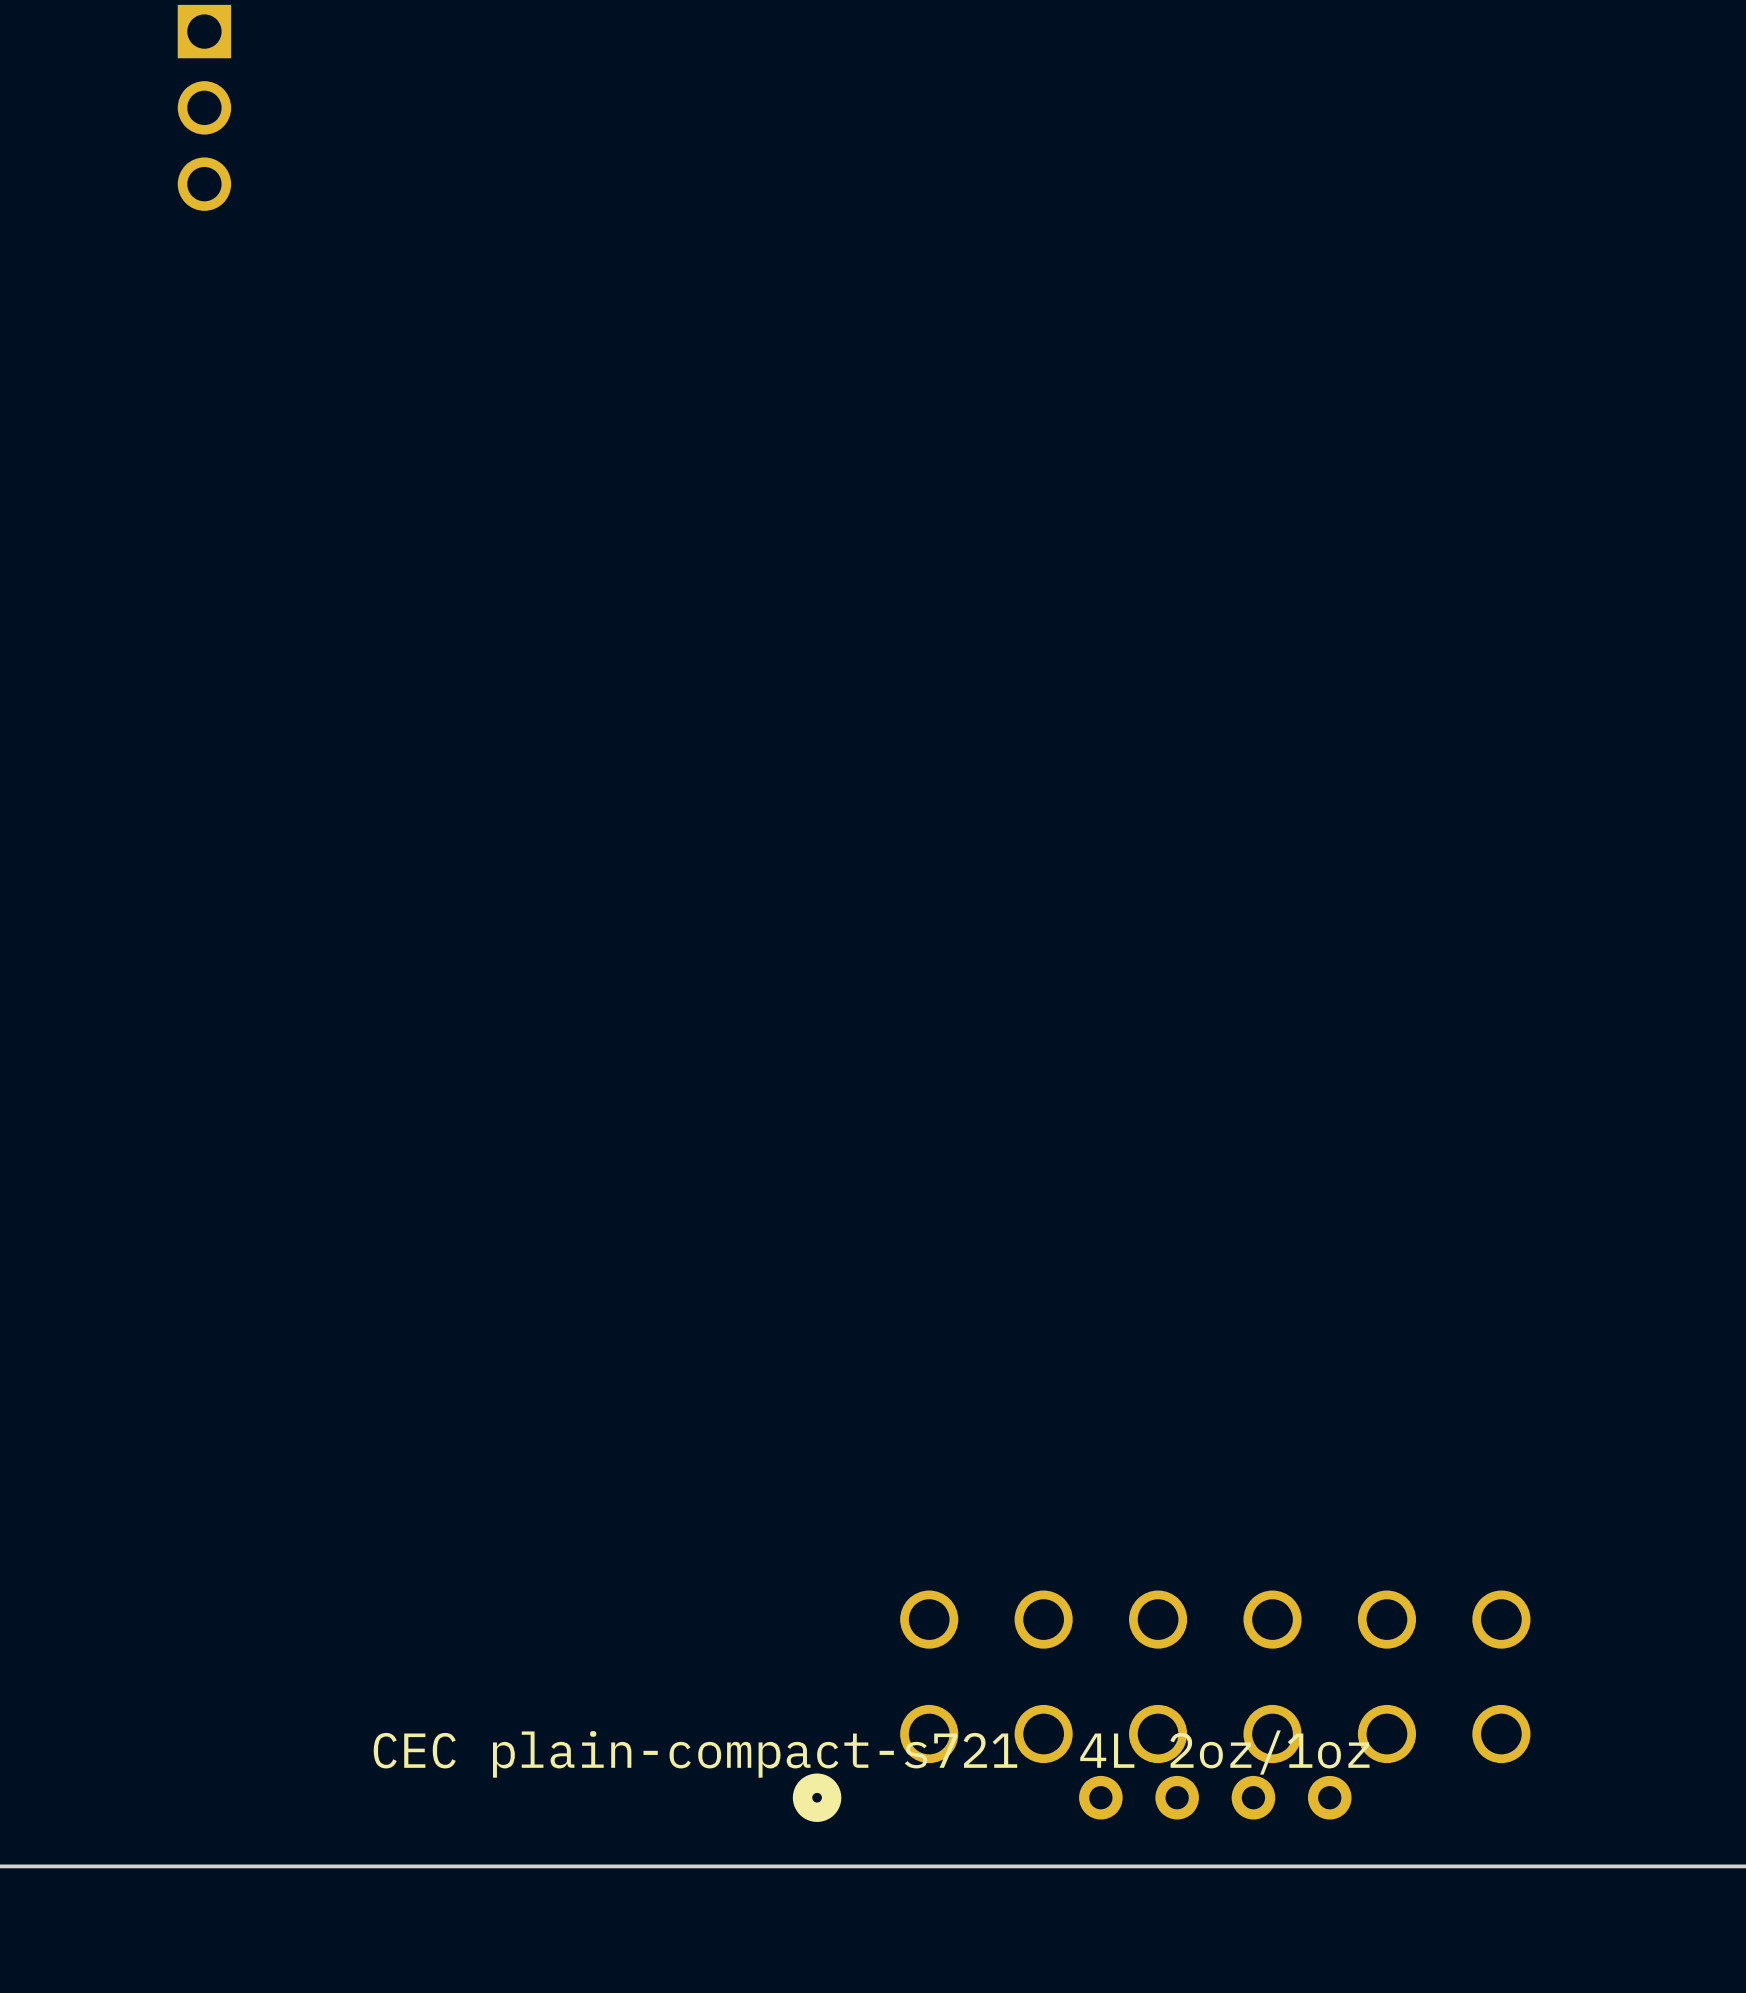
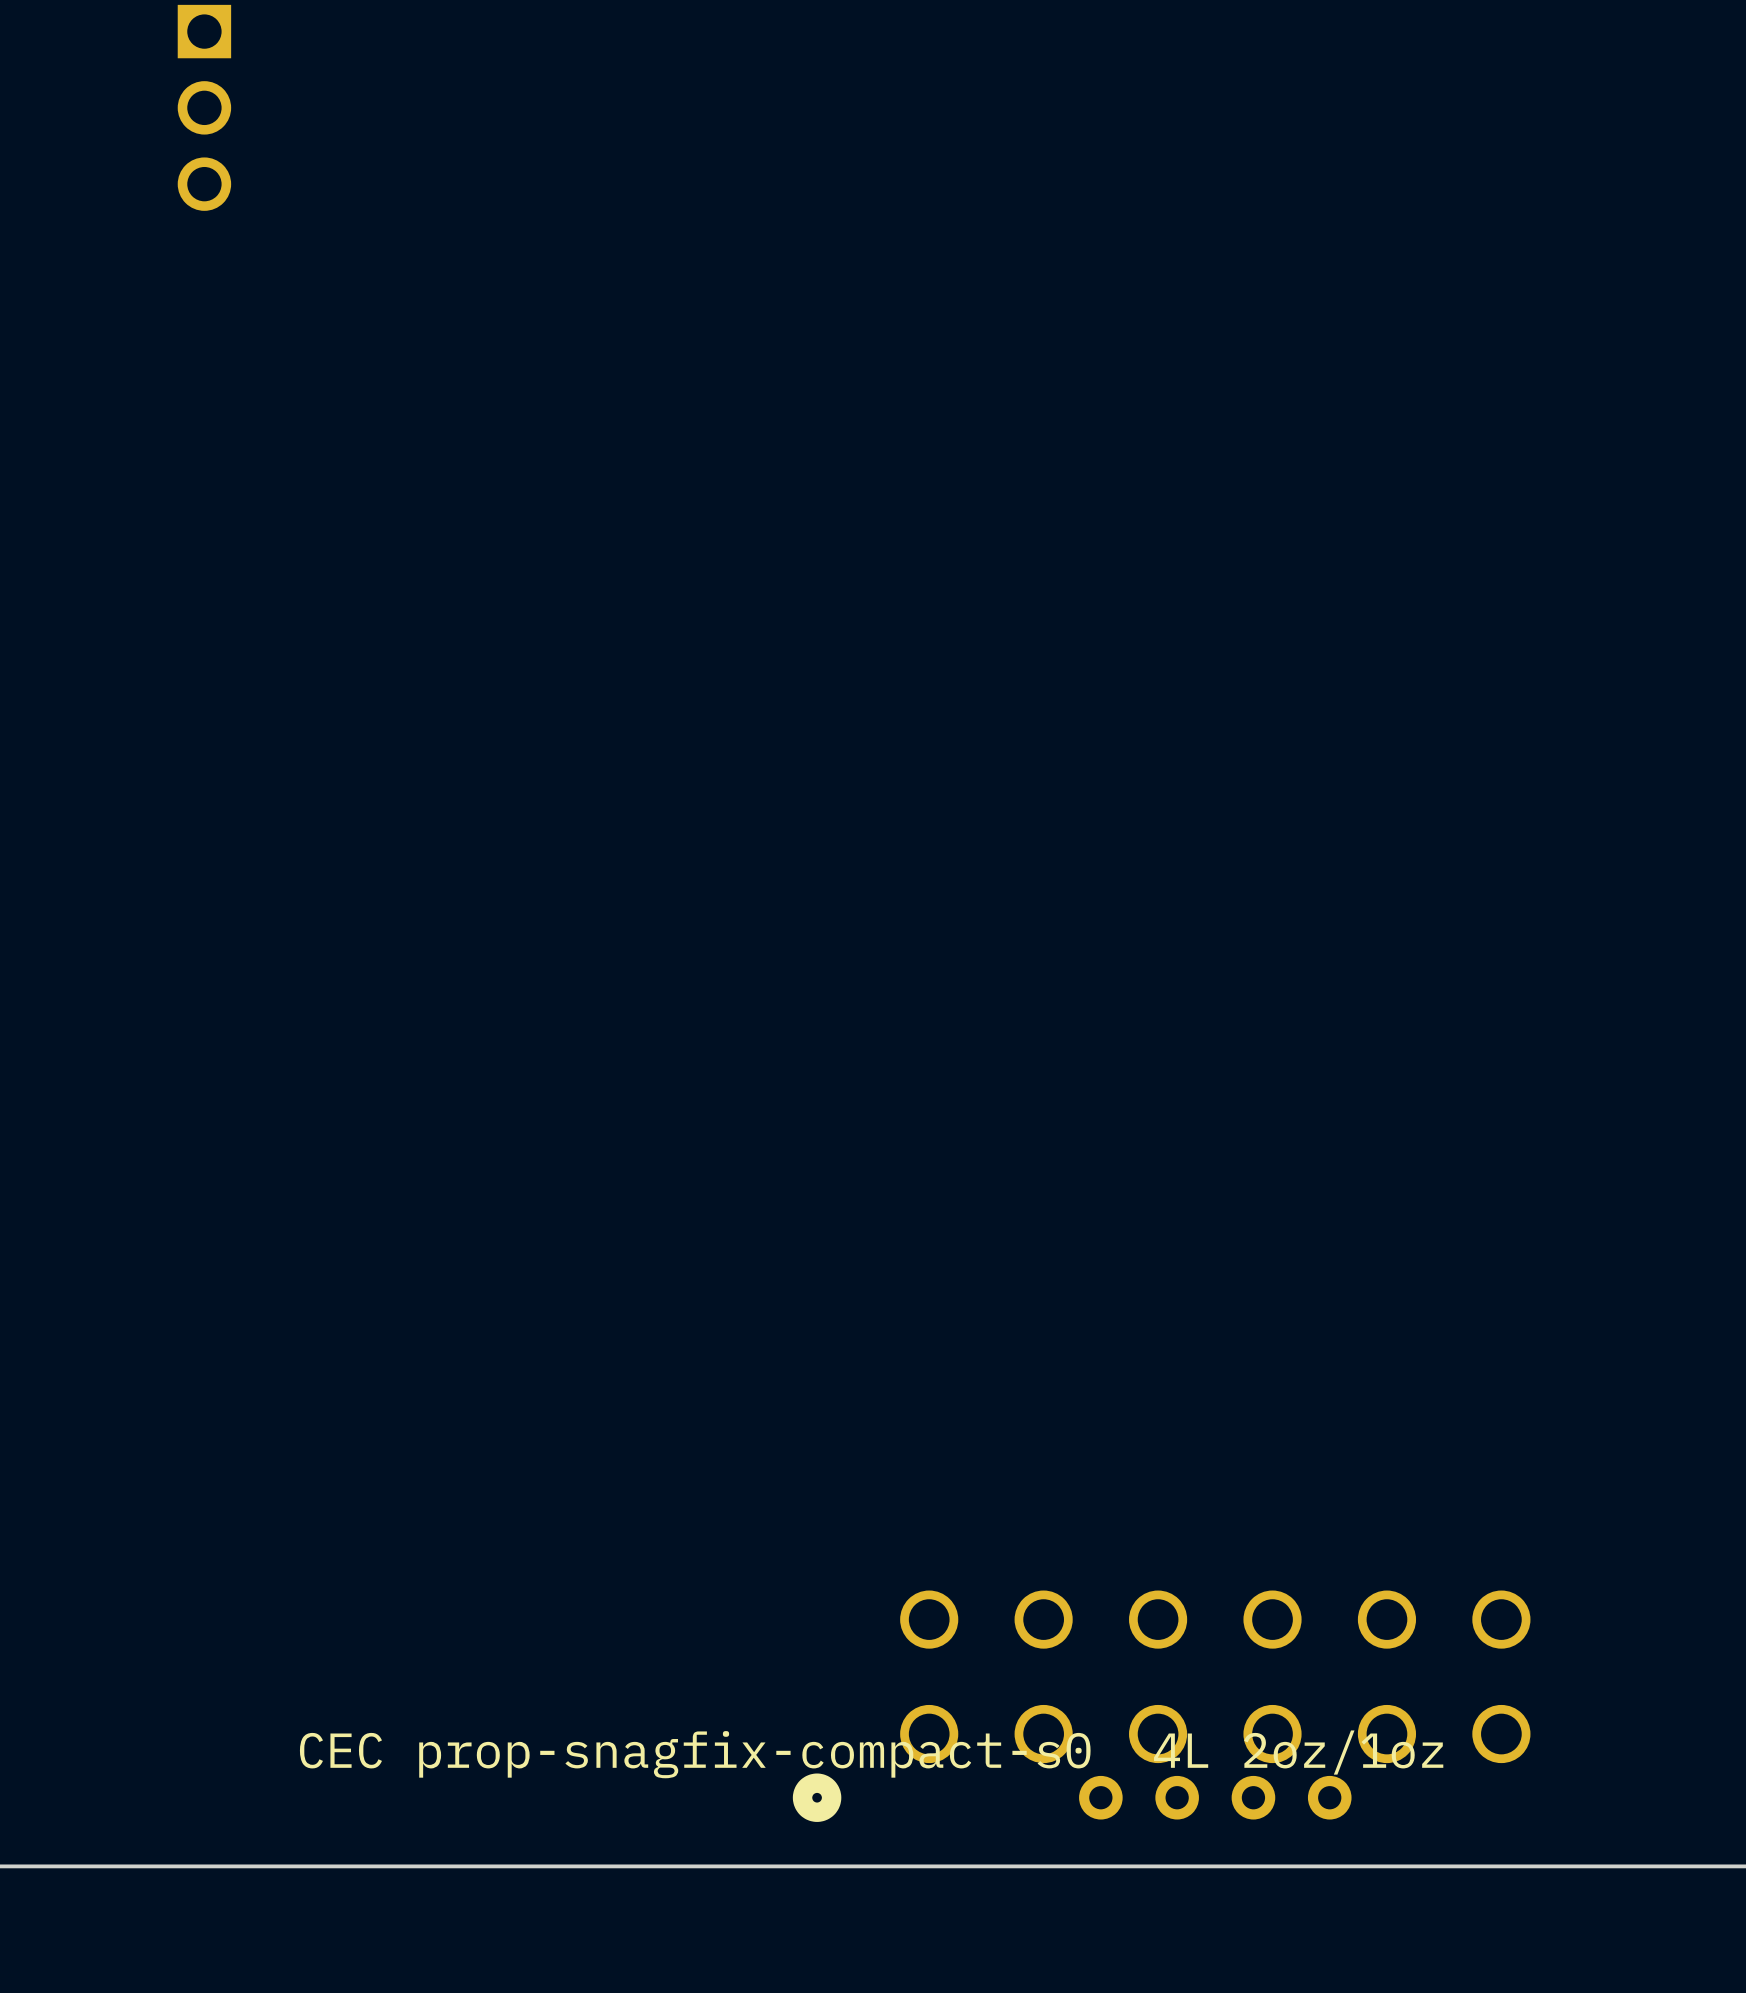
text: CEC plain-compact-s721 4L 2oz/1oz (871, 1754) -> CEC prop-snagfix-compact-s0 4L 2oz/1oz (871, 1754)

